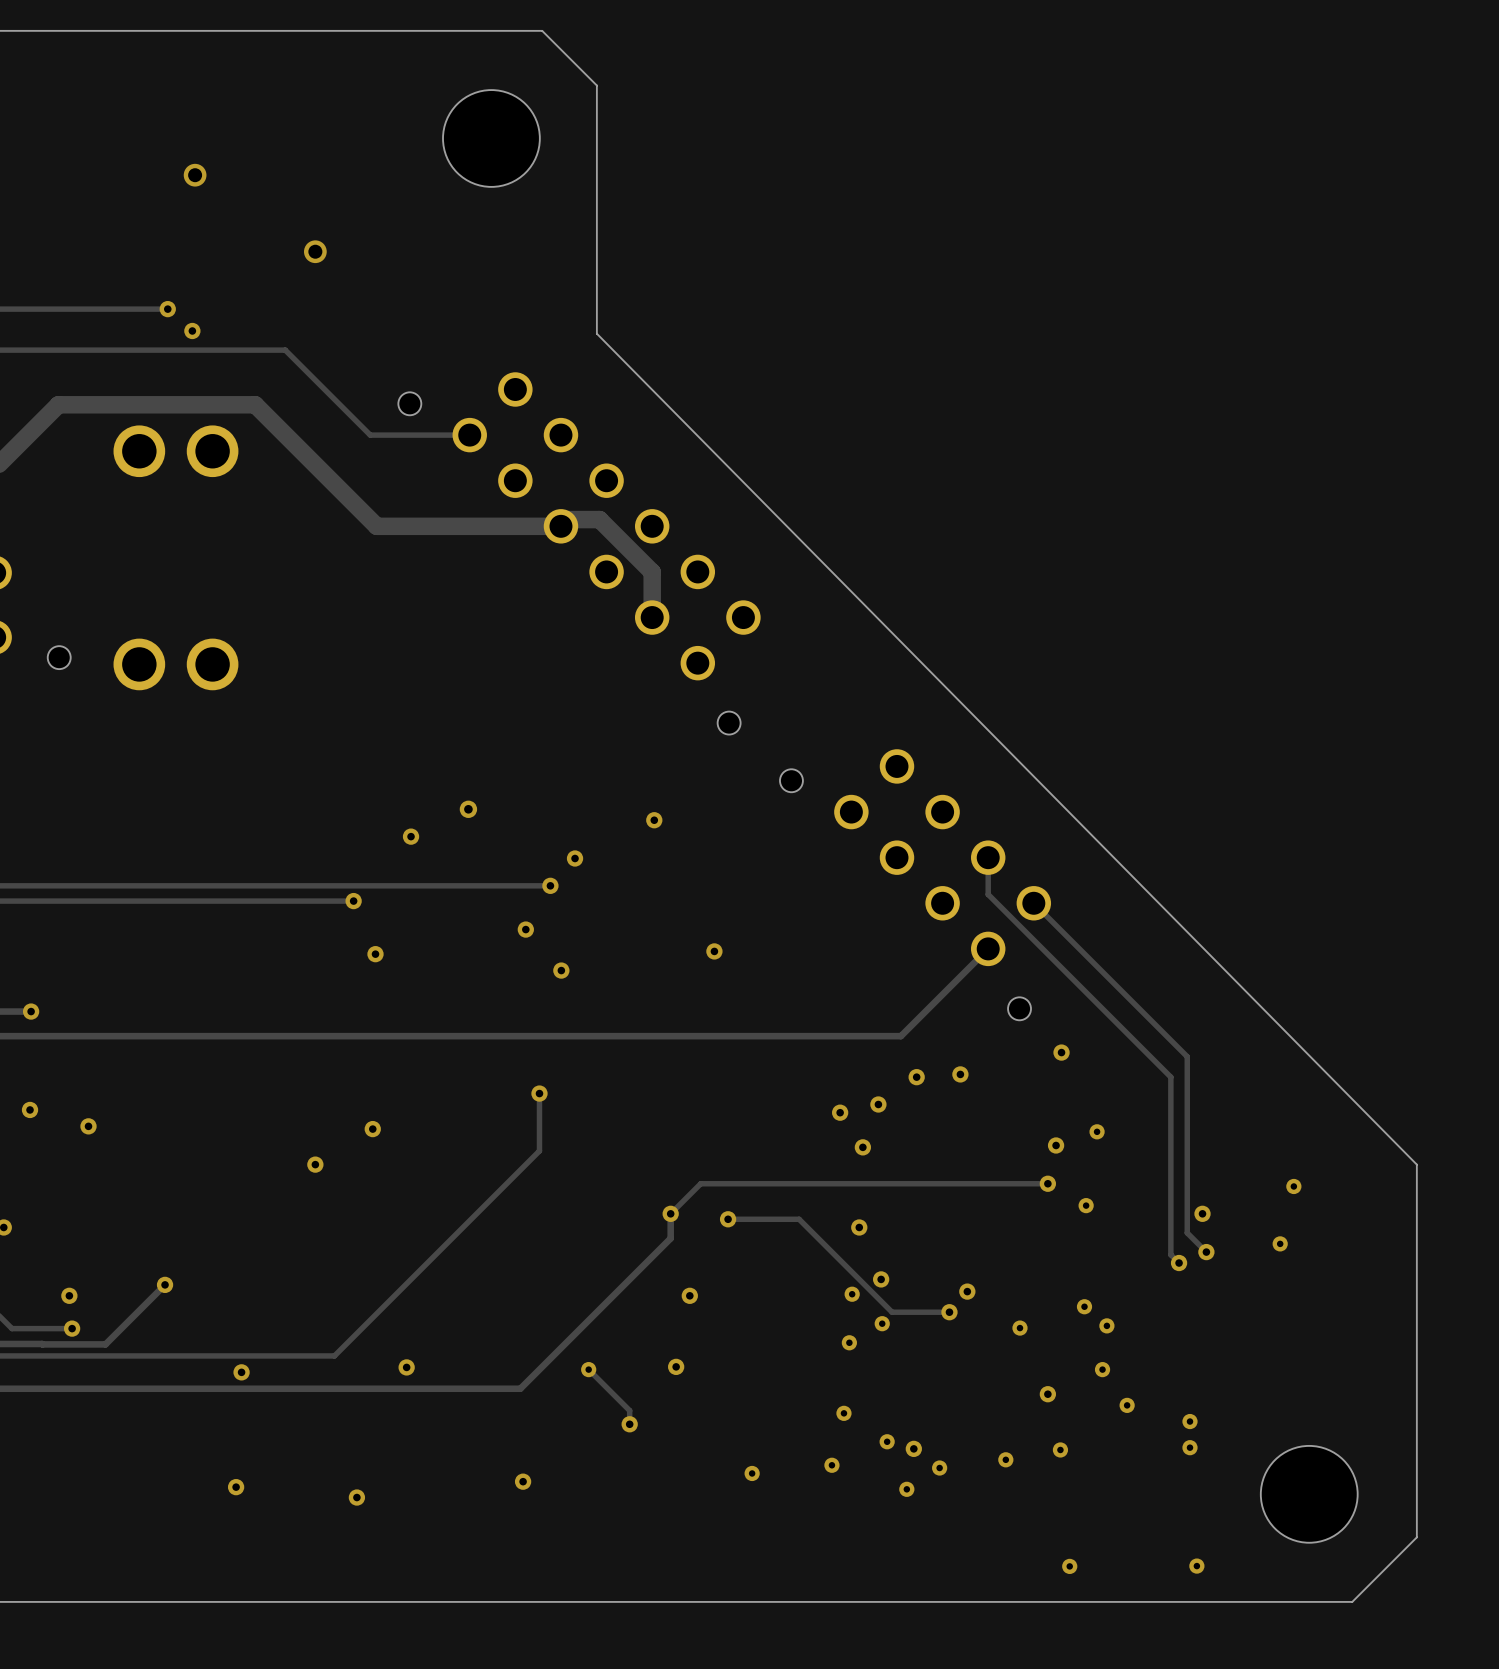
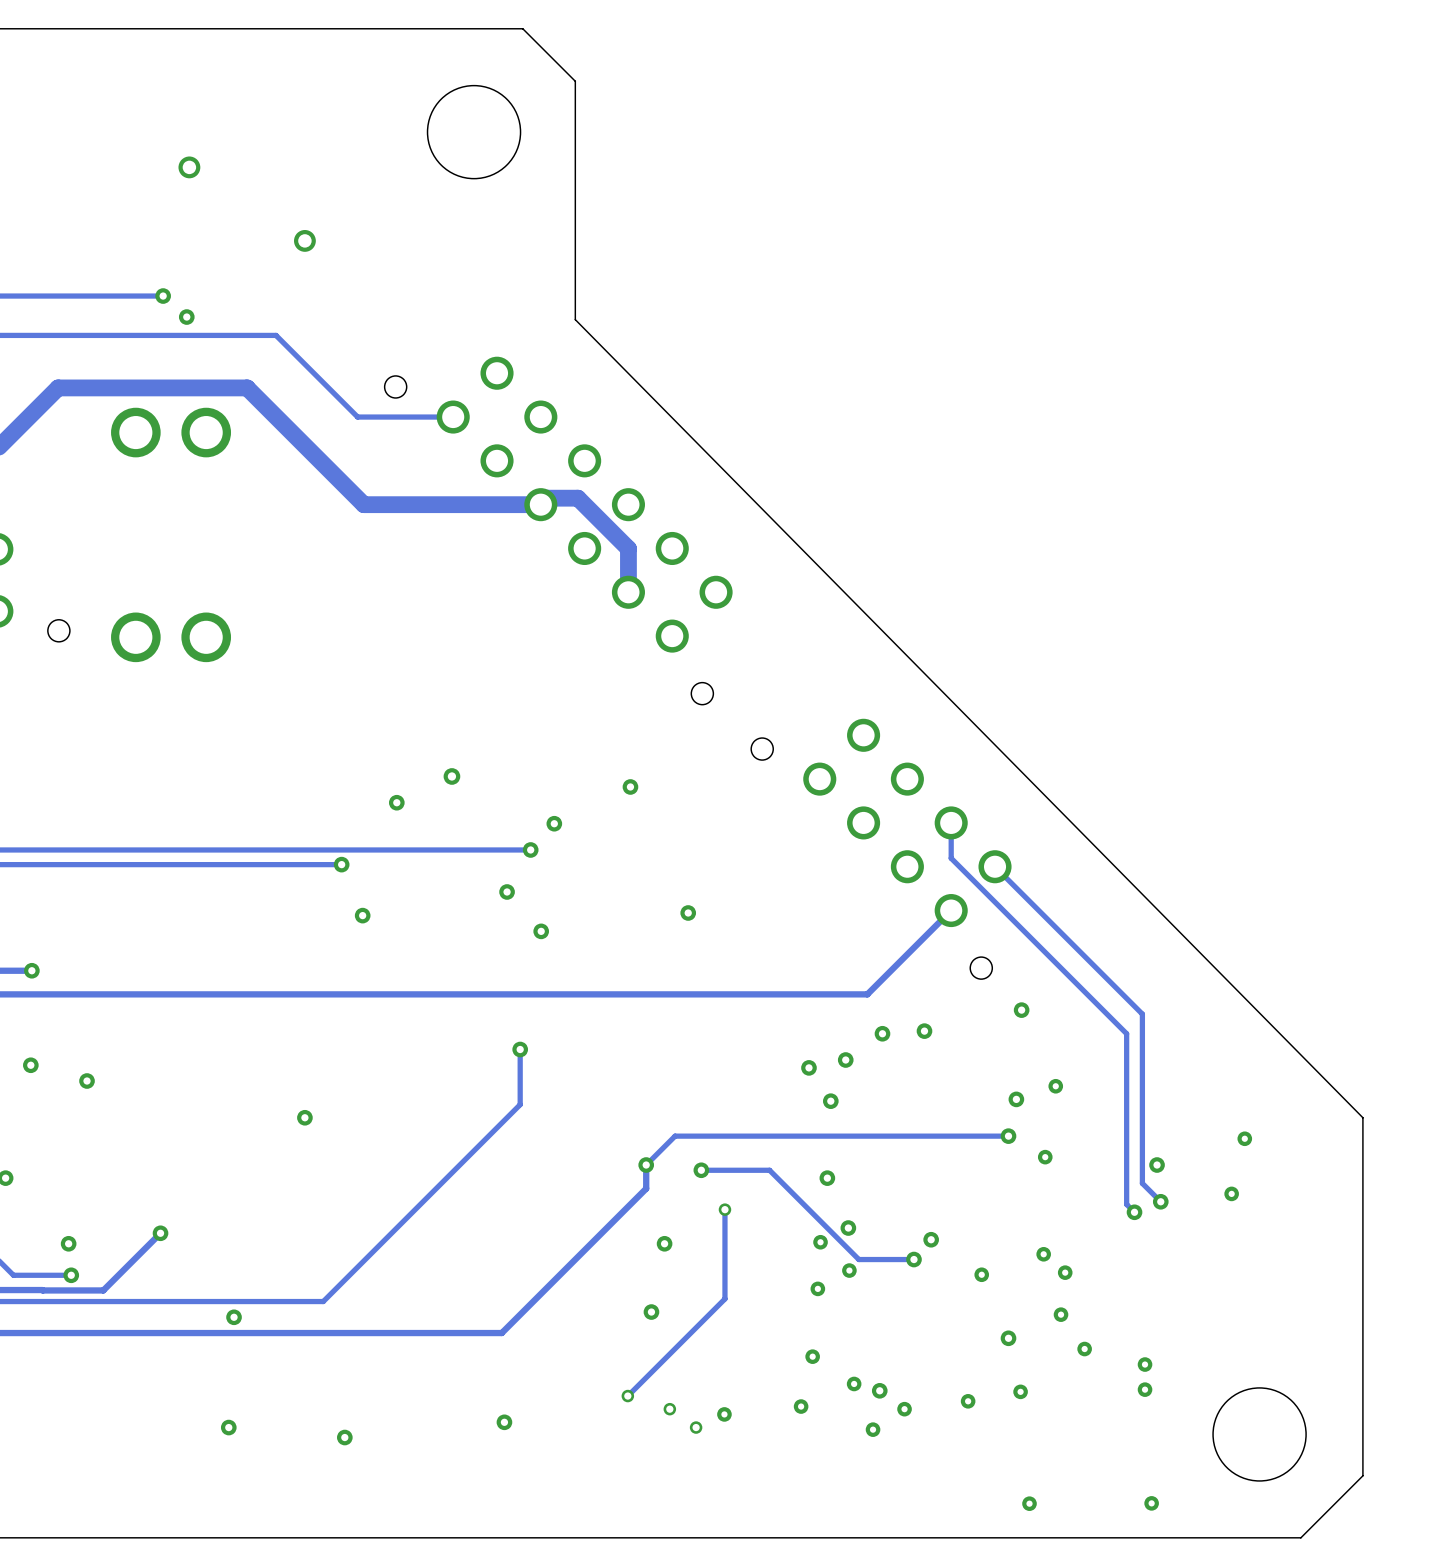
via: (372, 1129) -> none
track: none -> (724, 1209) (724, 1298) (627, 1396)
via: none -> (724, 1209)
via: (406, 1367) -> none
track: (588, 1369) (629, 1410) (629, 1424) -> none
via: (588, 1369) -> none
via: (629, 1424) -> none
via: none -> (627, 1396)
via: none -> (669, 1409)
via: none -> (696, 1427)

